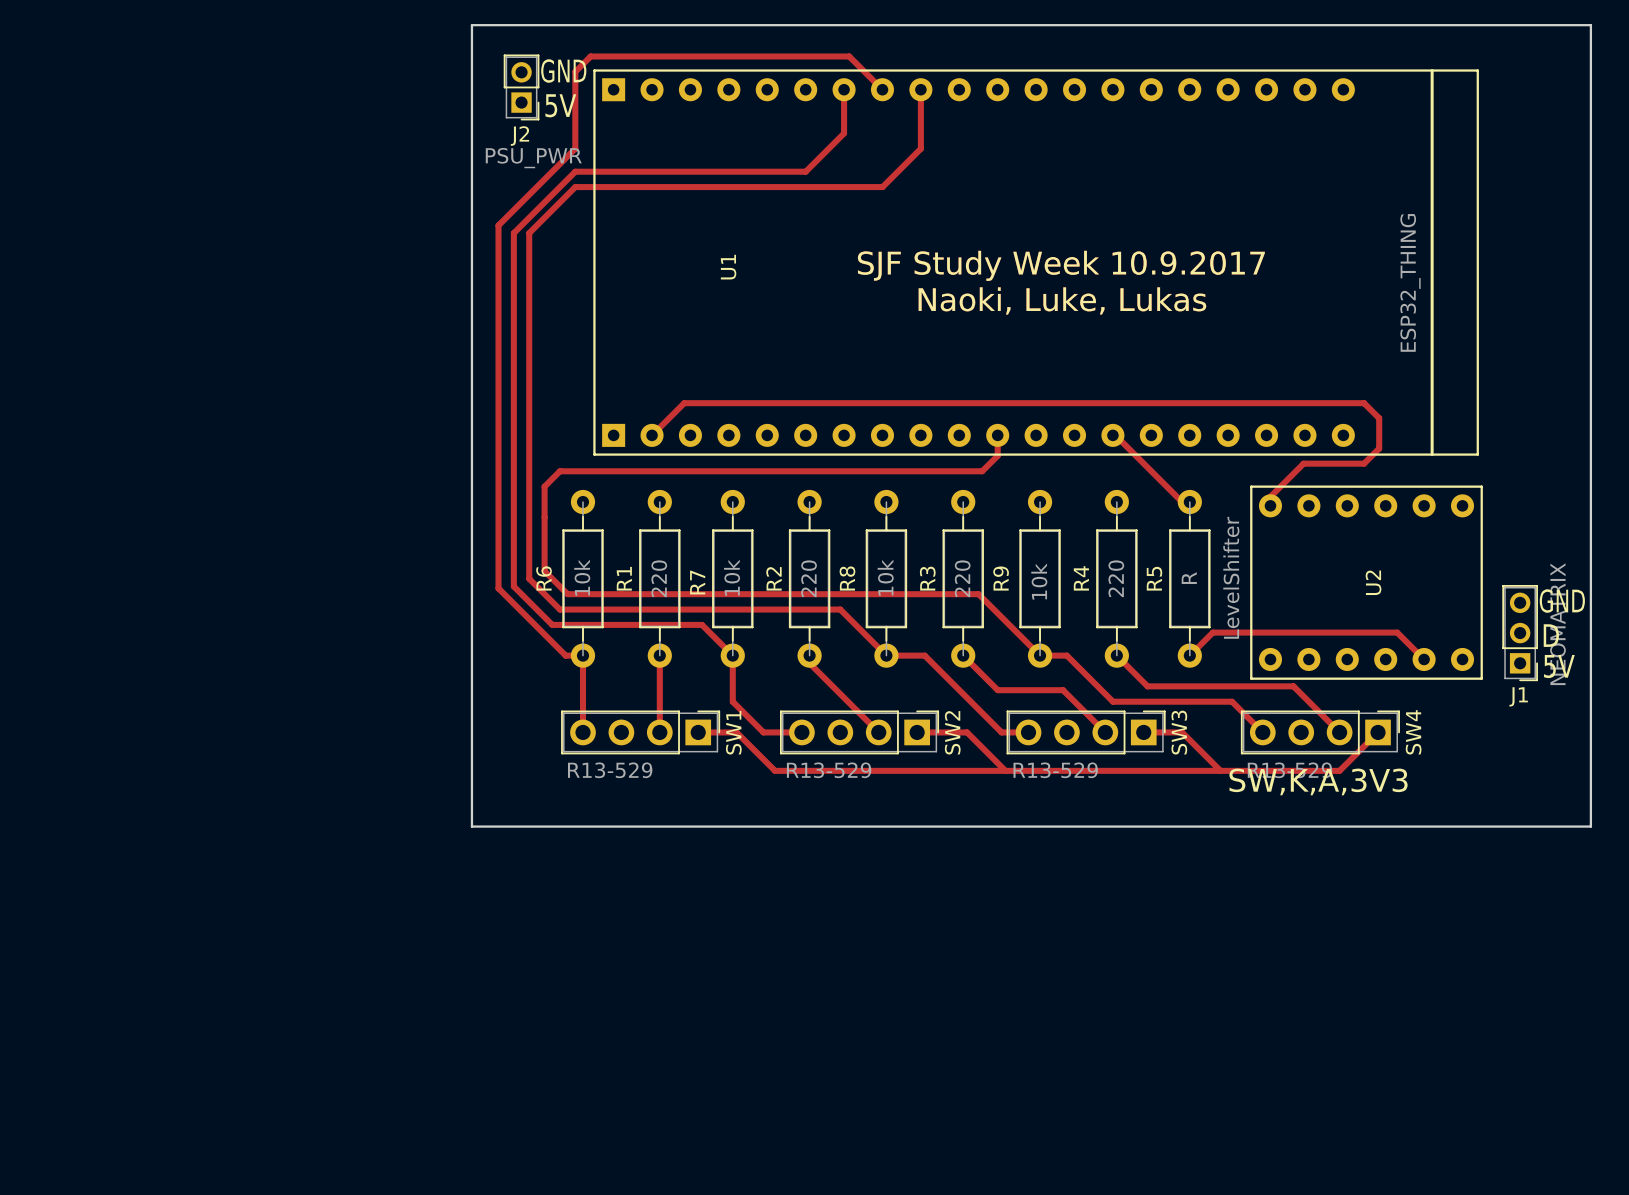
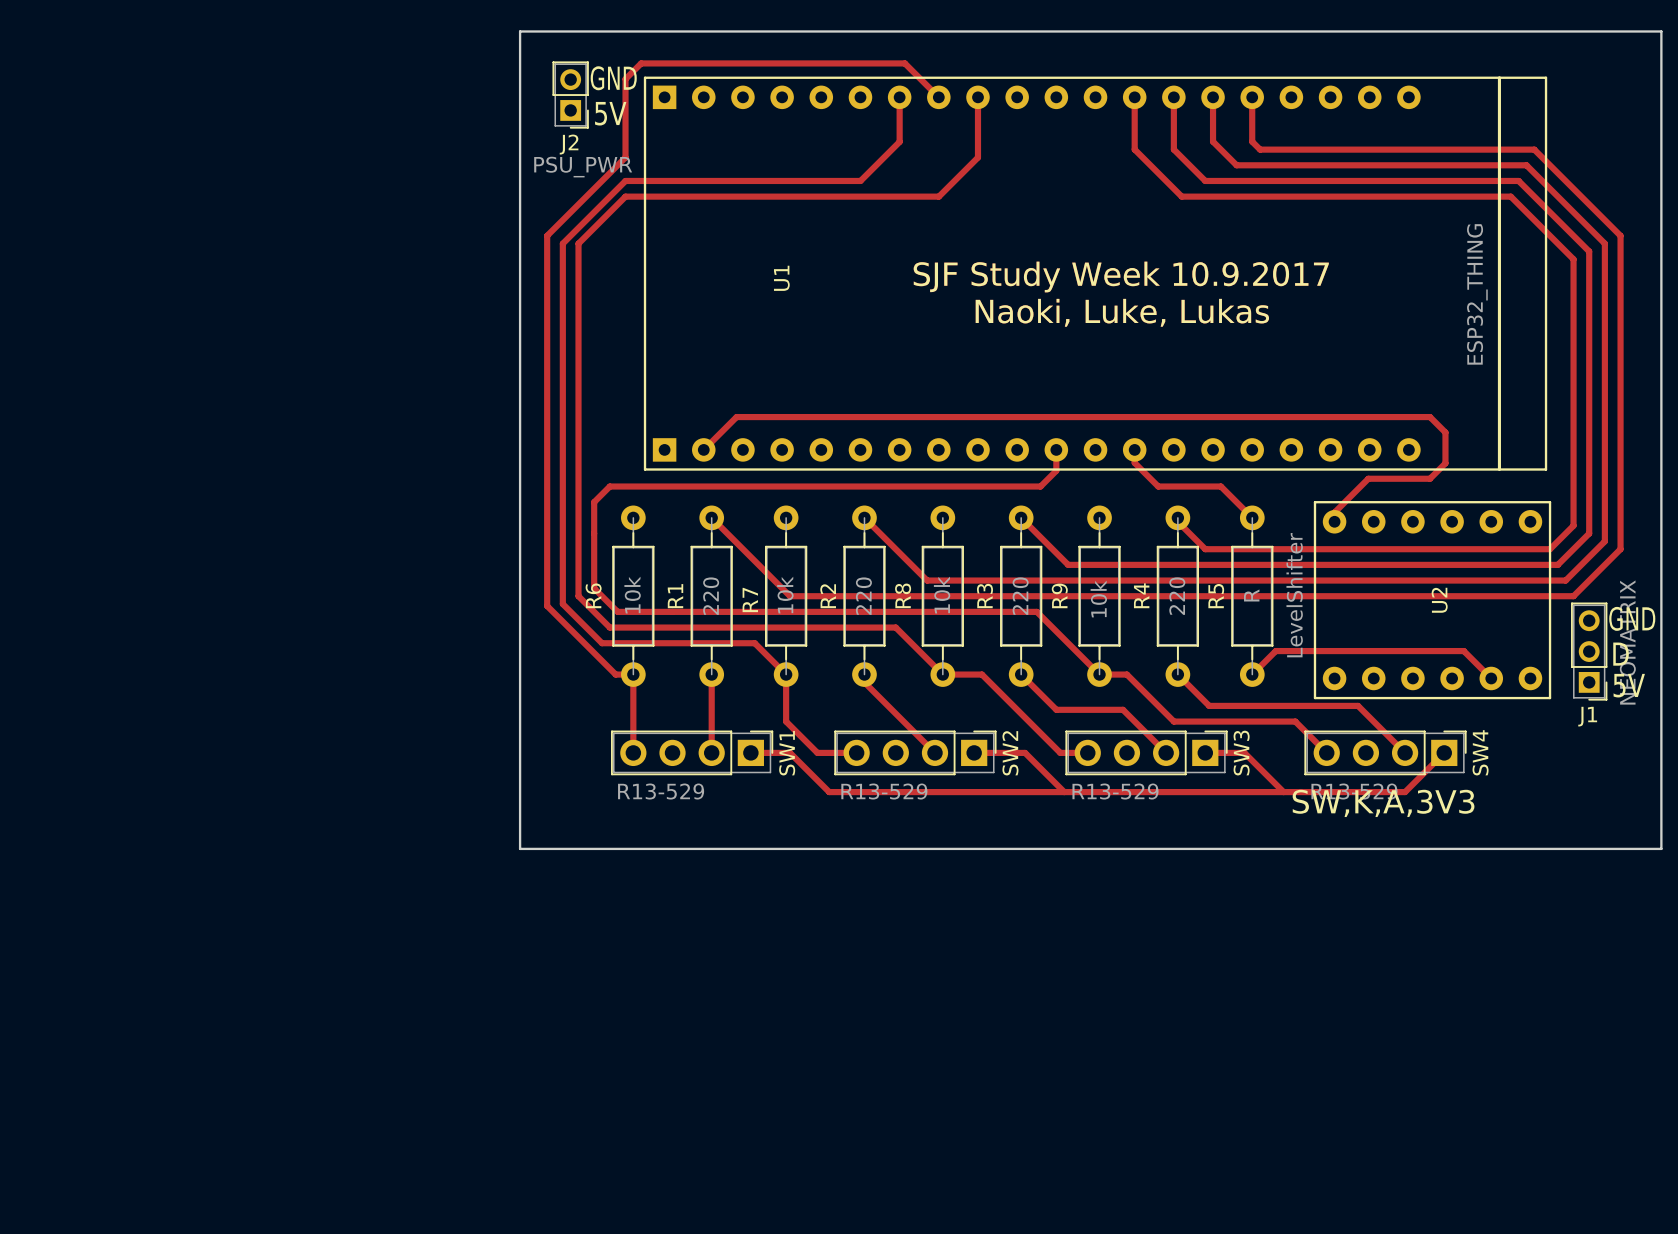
track: none -> (1134, 97) (1134, 149) (1181, 196) (1510, 196) (1573, 259) (1573, 525) (1550, 549) (1205, 549) (1177, 521)
track: none -> (1173, 97) (1173, 149) (1205, 180) (1518, 180) (1589, 251) (1589, 533) (1557, 564) (1068, 564) (1021, 517)
track: none -> (1213, 97) (1213, 141) (1236, 165) (1526, 165) (1604, 243) (1604, 541) (1565, 580) (927, 580) (864, 517)
track: none -> (1252, 97) (1252, 141) (1260, 149) (1534, 149) (1620, 235) (1620, 549) (1573, 596) (790, 596) (711, 517)
track: (1112, 435) (1115, 435) (1182, 502) (1189, 502) -> (1134, 449) (1134, 462) (1158, 486) (1220, 486) (1252, 517)

